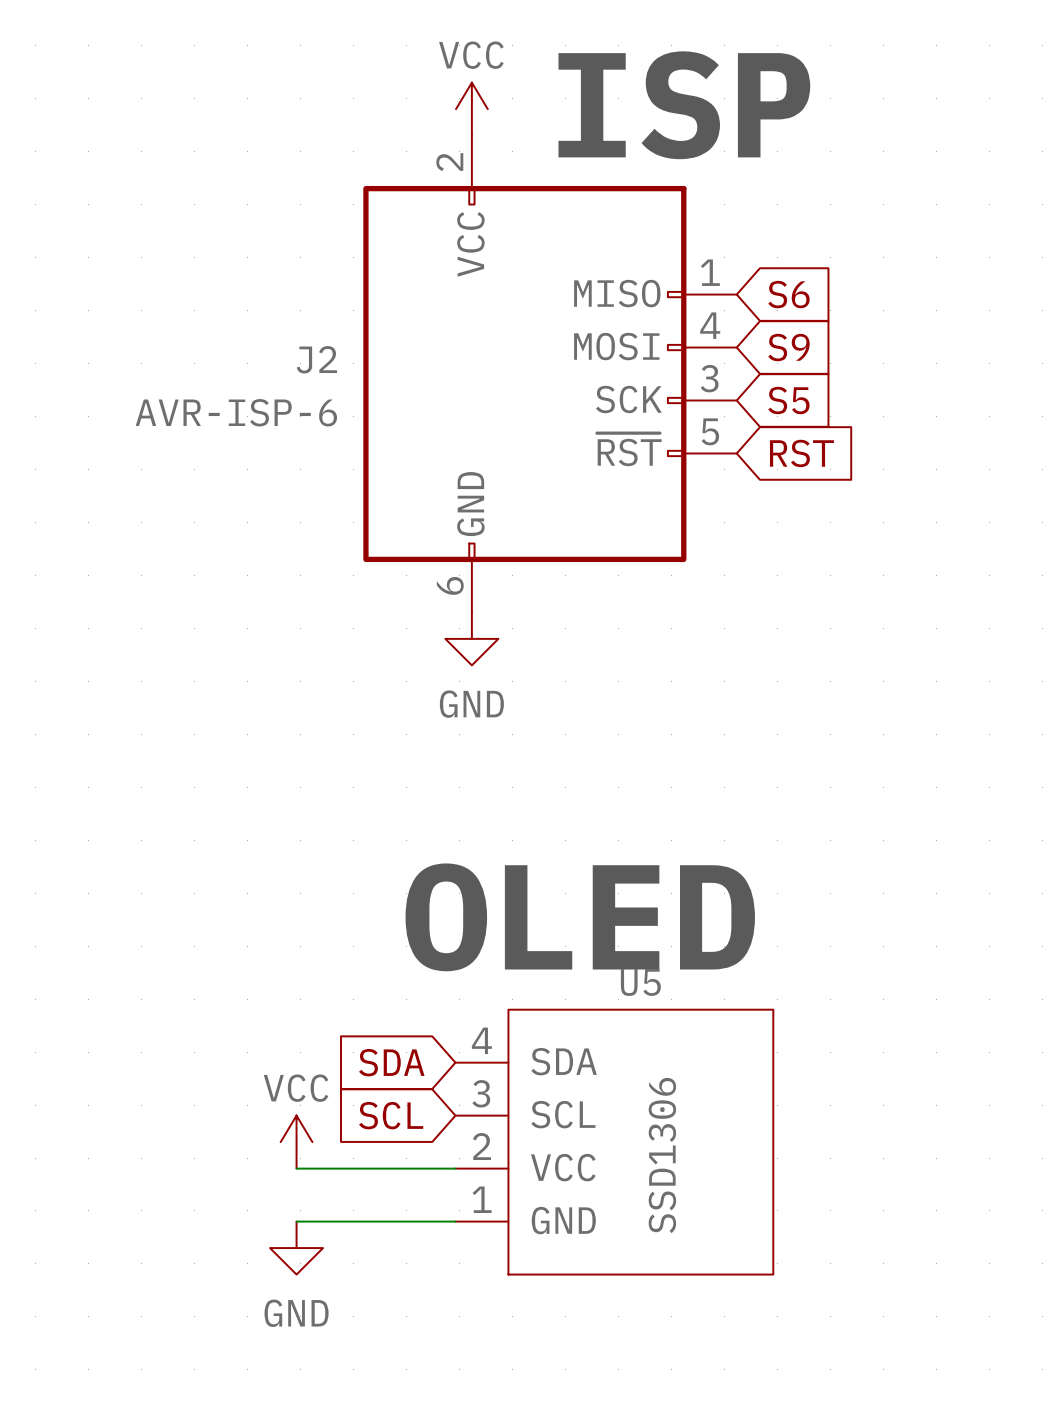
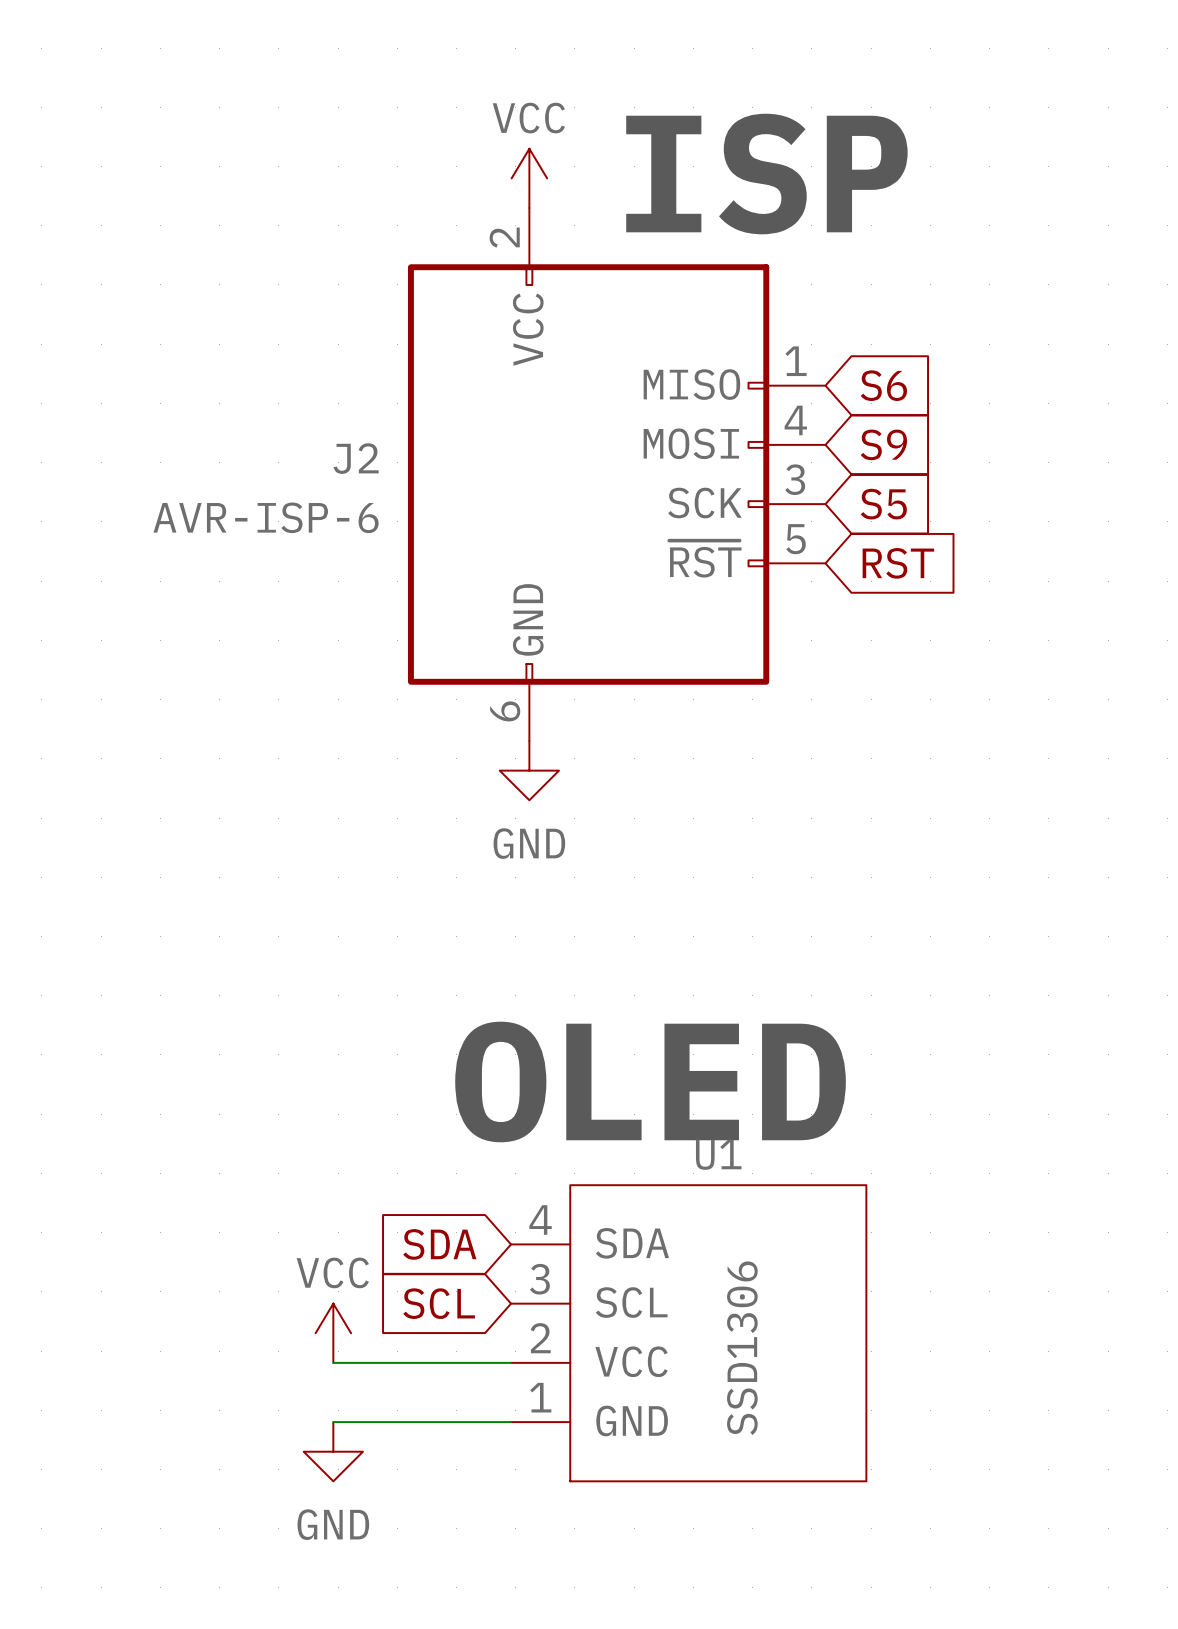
U5 name: U5 (640, 982) -> U1 (718, 1154)

